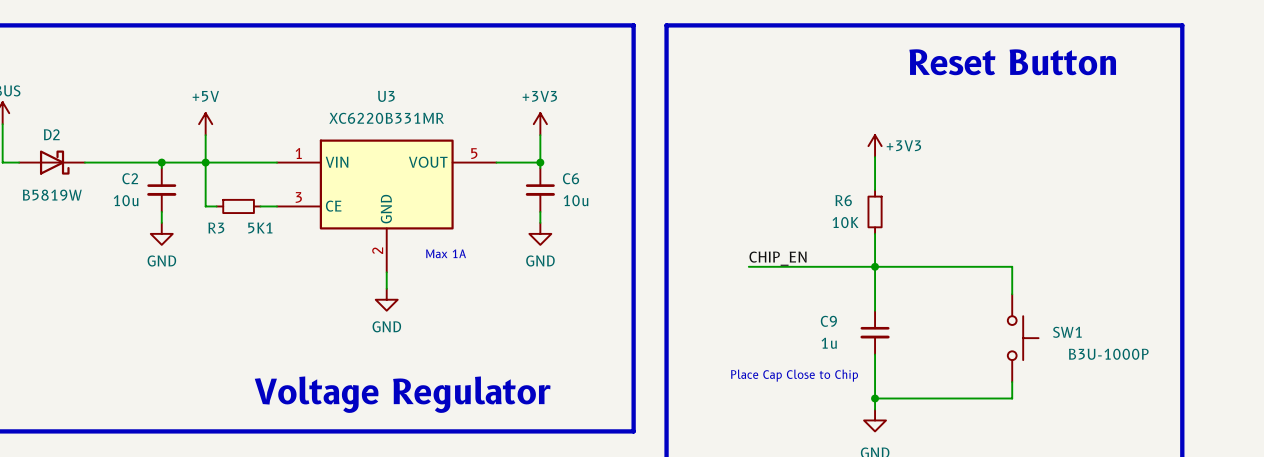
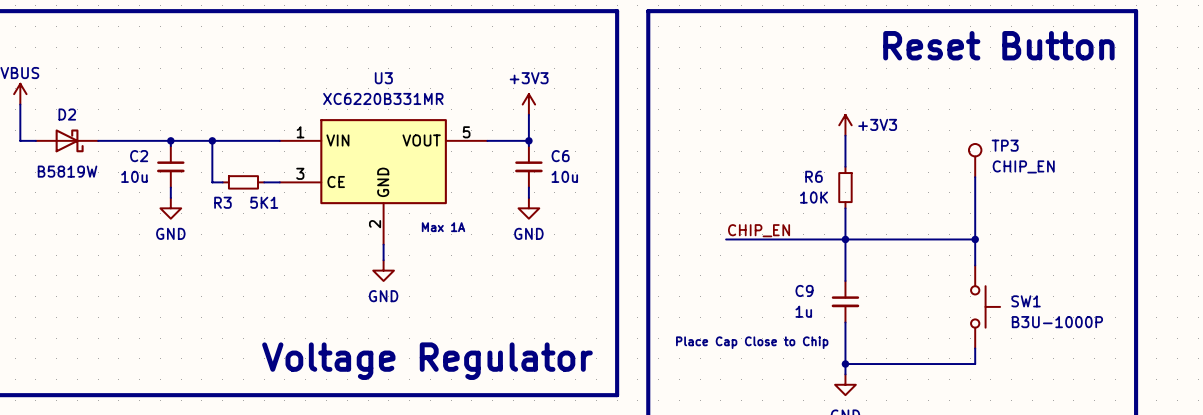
power symbol: +5V (205, 124) -> none
wire: (205, 135) (205, 162) -> none
TP3: none -> CHIP_EN (975, 160)
wire: none -> (975, 177) (975, 239)
junction: none -> (975, 239)

